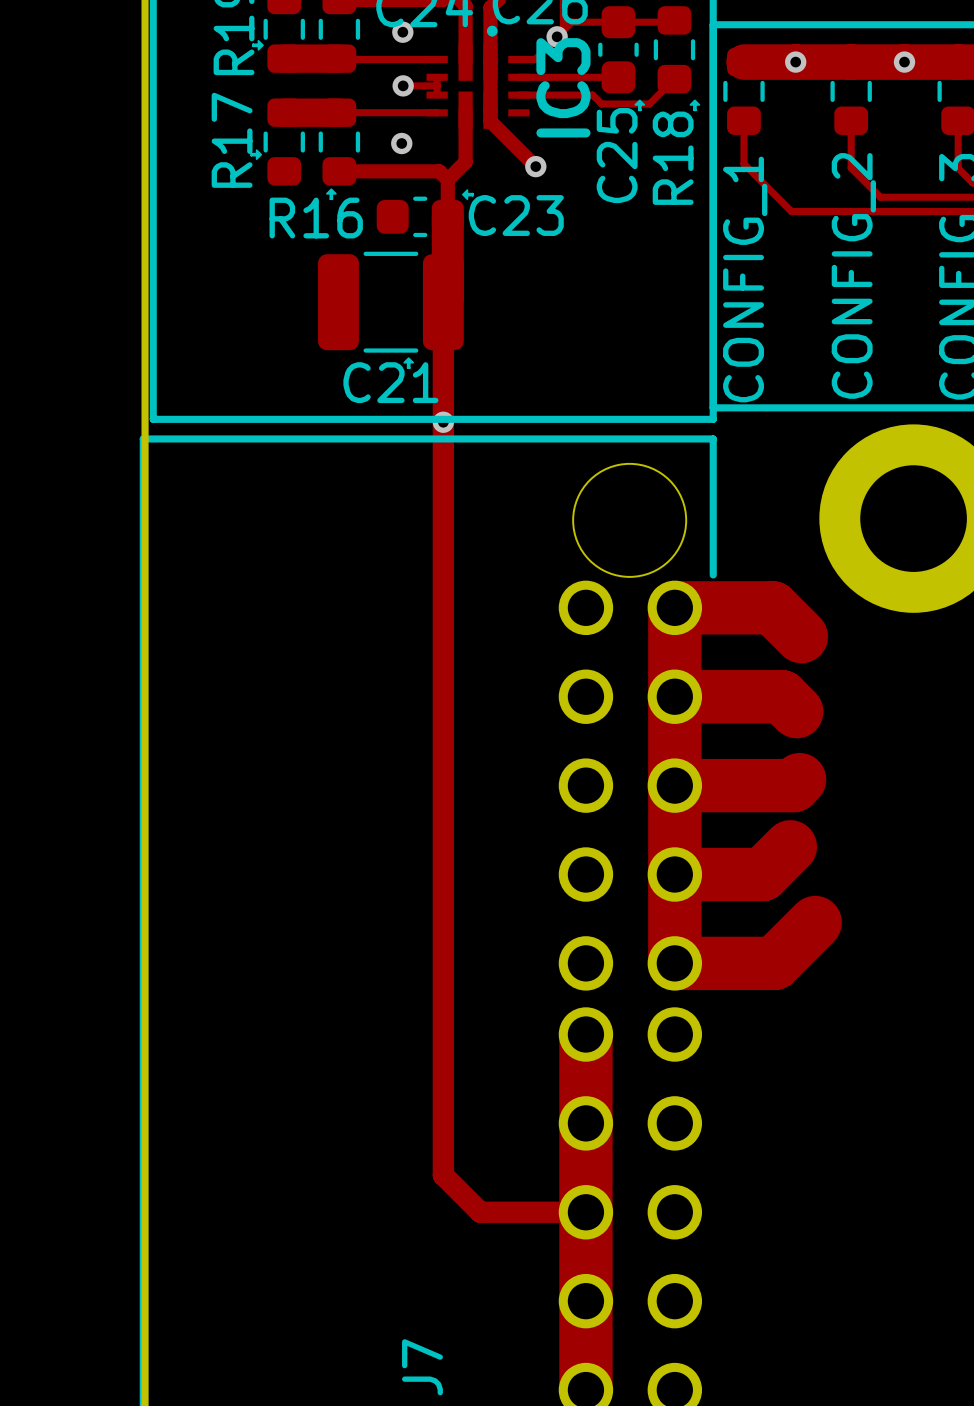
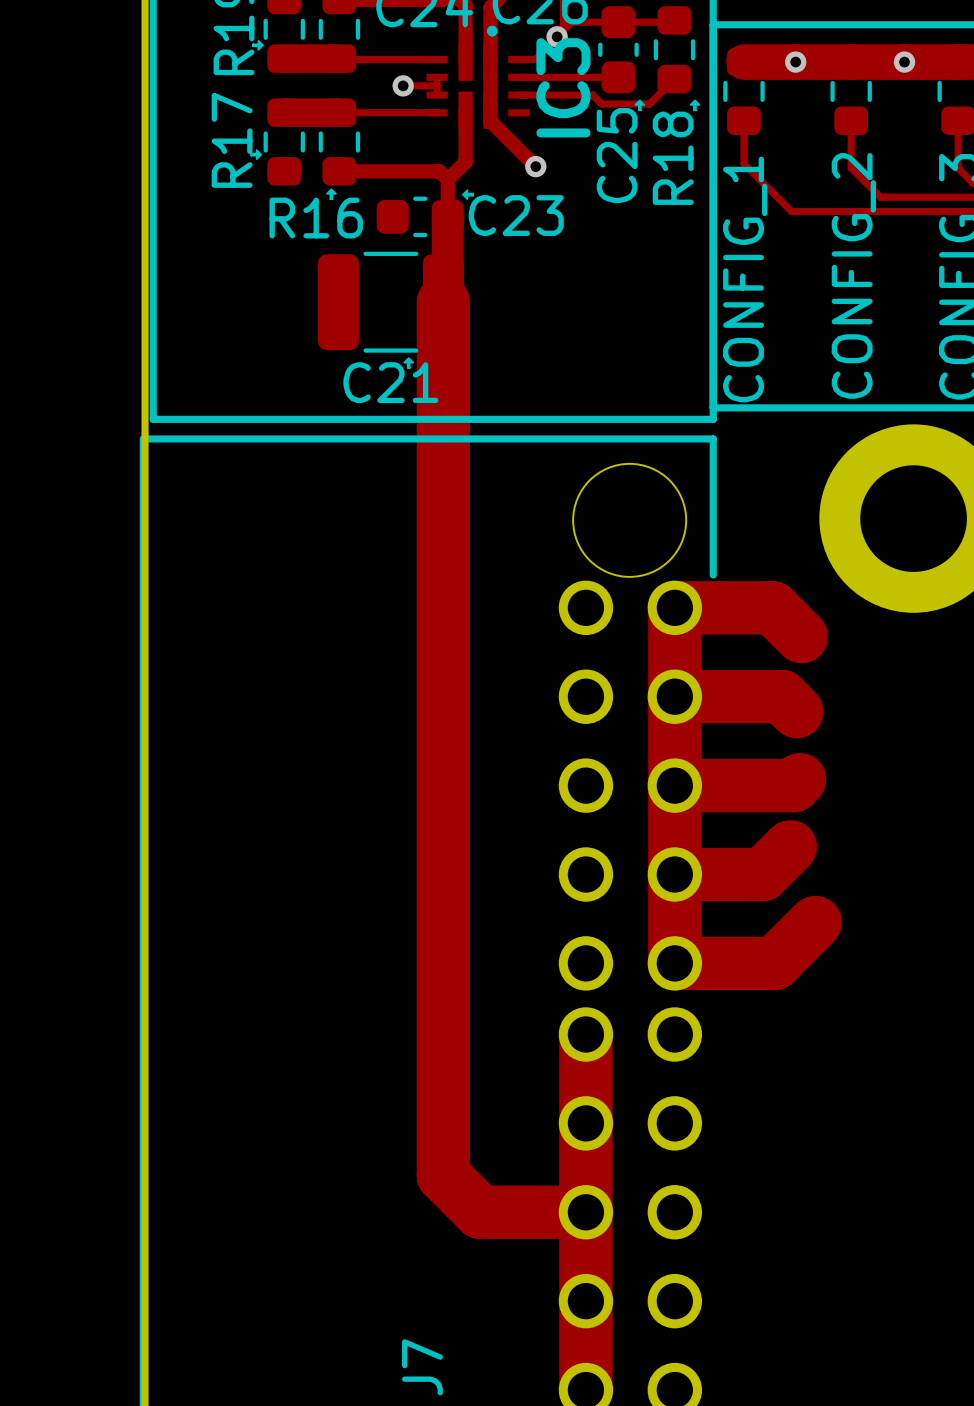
via: (402, 32) -> none
via: (401, 143) -> none
track width: thin (443, 302) (443, 1175) (480, 1212) (585, 1212) -> thick (443, 302) (443, 1175) (480, 1212) (585, 1212)
via: (443, 422) -> none

